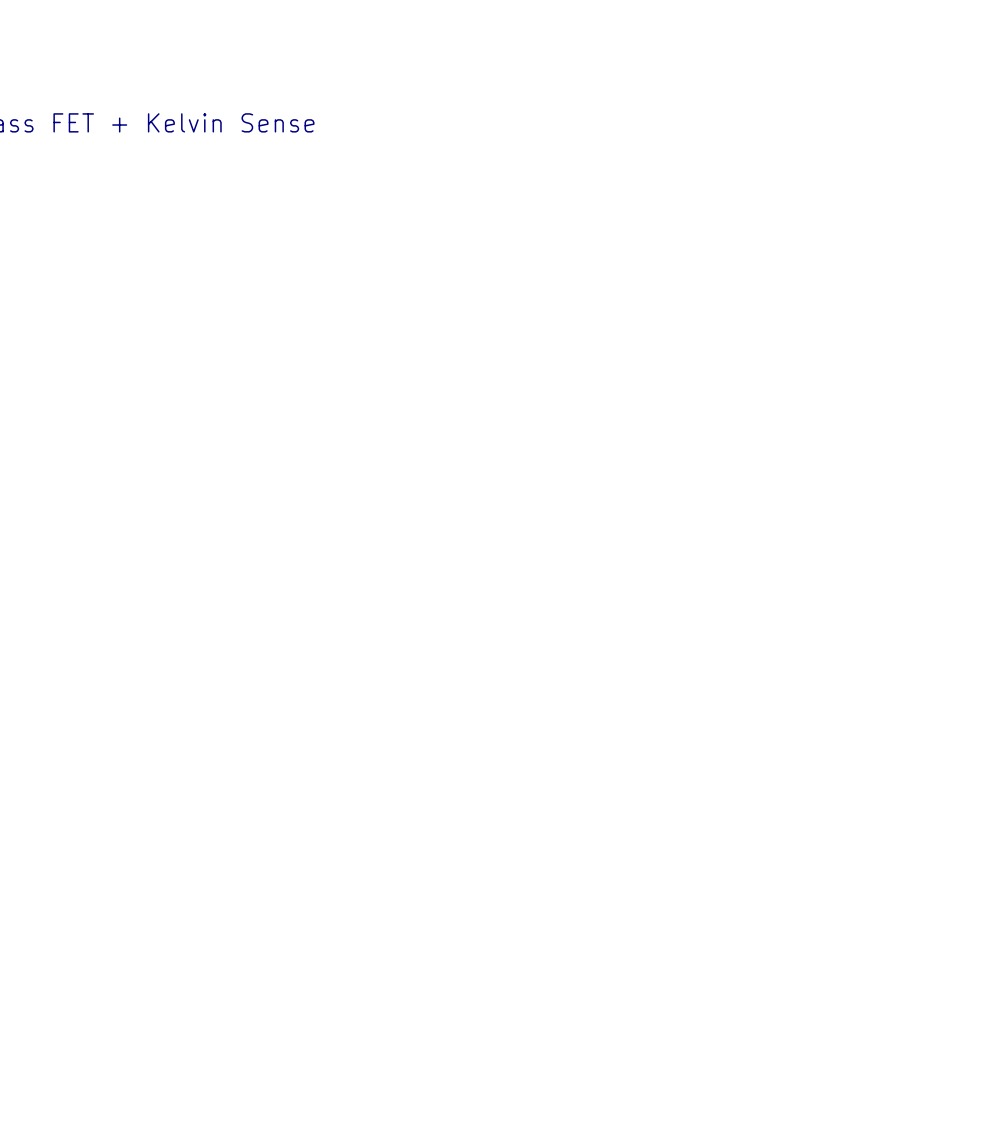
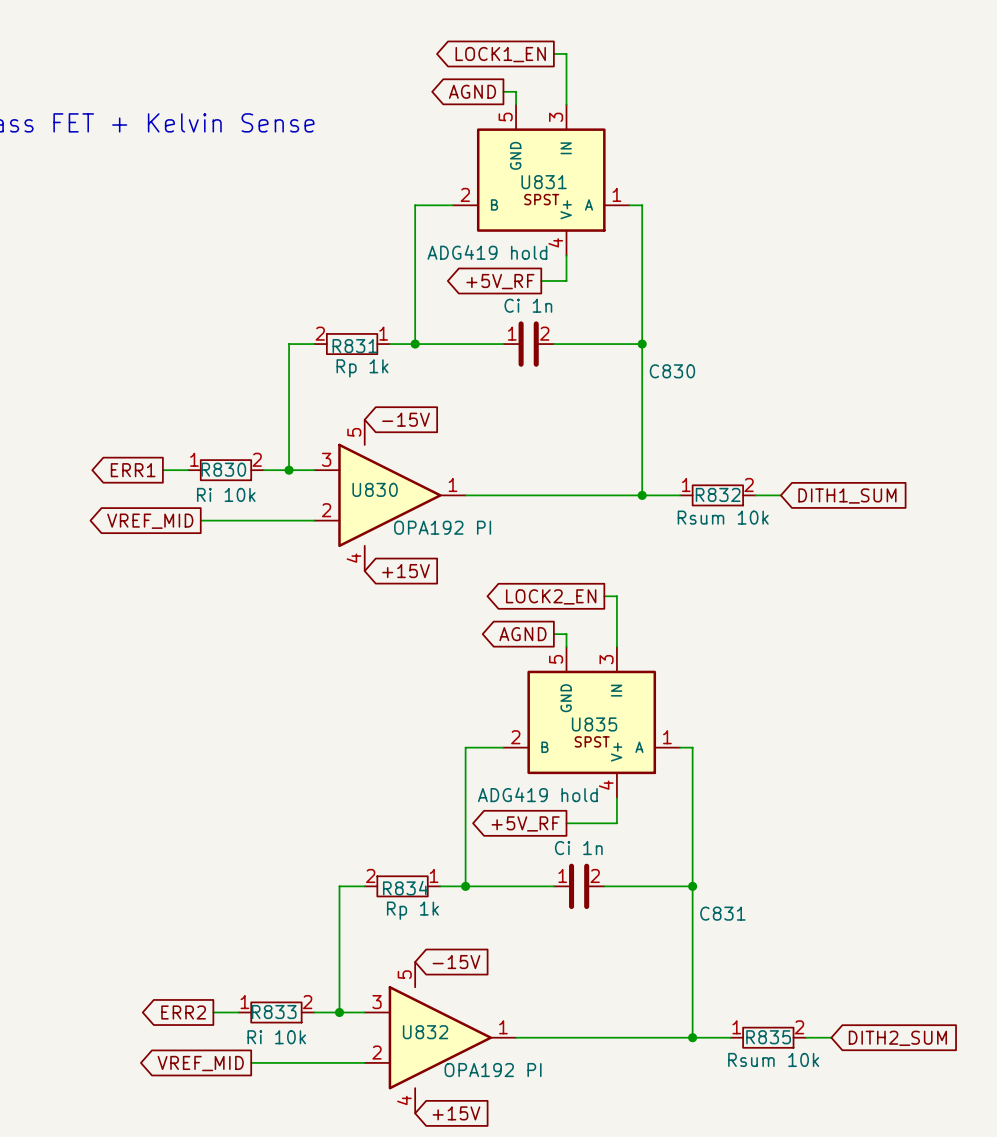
wire: none -> (553, 53) (566, 53) (566, 104)
global label: none -> LOCK1_EN (500, 54)
global label: none -> AGND (472, 91)
wire: none -> (503, 91) (516, 91) (516, 104)
U831: none -> ADG419 hold (541, 180)
wire: none -> (452, 205) (415, 205) (415, 344)
wire: none -> (629, 205) (642, 205) (642, 495)
wire: none -> (566, 255) (566, 280) (541, 280)
global label: none -> +5V_RF (500, 281)
wire: none -> (314, 344) (289, 344) (289, 470)
R831: none -> Rp 1k (352, 344)
wire: none -> (389, 344) (503, 344)
junction: none -> (415, 344)
C830: none -> Ci 1n (528, 344)
wire: none -> (553, 344) (642, 344)
junction: none -> (642, 344)
global label: none -> -15V (406, 419)
global label: none -> ERR1 (133, 470)
wire: none -> (162, 470) (188, 470)
R830: none -> Ri 10k (225, 470)
wire: none -> (263, 470) (314, 470)
junction: none -> (289, 470)
U830: none -> OPA192 PI (389, 495)
wire: none -> (465, 495) (680, 495)
junction: none -> (642, 495)
R832: none -> Rsum 10k (717, 495)
wire: none -> (755, 495) (780, 495)
global label: none -> DITH1_SUM (847, 496)
wire: none -> (200, 520) (314, 520)
global label: none -> VREF_MID (150, 521)
global label: none -> +15V (406, 571)
global label: none -> LOCK2_EN (551, 596)
wire: none -> (604, 596) (616, 596) (616, 646)
global label: none -> AGND (522, 634)
wire: none -> (553, 634) (566, 634) (566, 646)
U835: none -> ADG419 hold (591, 722)
wire: none -> (503, 747) (465, 747) (465, 886)
wire: none -> (680, 747) (692, 747) (692, 1037)
wire: none -> (616, 798) (616, 823) (566, 823)
global label: none -> +5V_RF (525, 823)
wire: none -> (364, 886) (339, 886) (339, 1012)
R834: none -> Rp 1k (402, 886)
wire: none -> (440, 886) (553, 886)
junction: none -> (465, 886)
C831: none -> Ci 1n (579, 886)
wire: none -> (604, 886) (692, 886)
junction: none -> (692, 886)
global label: none -> -15V (456, 962)
global label: none -> ERR2 (183, 1012)
wire: none -> (213, 1012) (238, 1012)
R833: none -> Ri 10k (276, 1012)
wire: none -> (314, 1012) (364, 1012)
junction: none -> (339, 1012)
U832: none -> OPA192 PI (440, 1037)
wire: none -> (516, 1037) (730, 1037)
junction: none -> (692, 1037)
R835: none -> Rsum 10k (768, 1037)
wire: none -> (806, 1037) (831, 1037)
global label: none -> DITH2_SUM (897, 1038)
wire: none -> (251, 1062) (364, 1062)
global label: none -> VREF_MID (200, 1063)
global label: none -> +15V (456, 1113)

